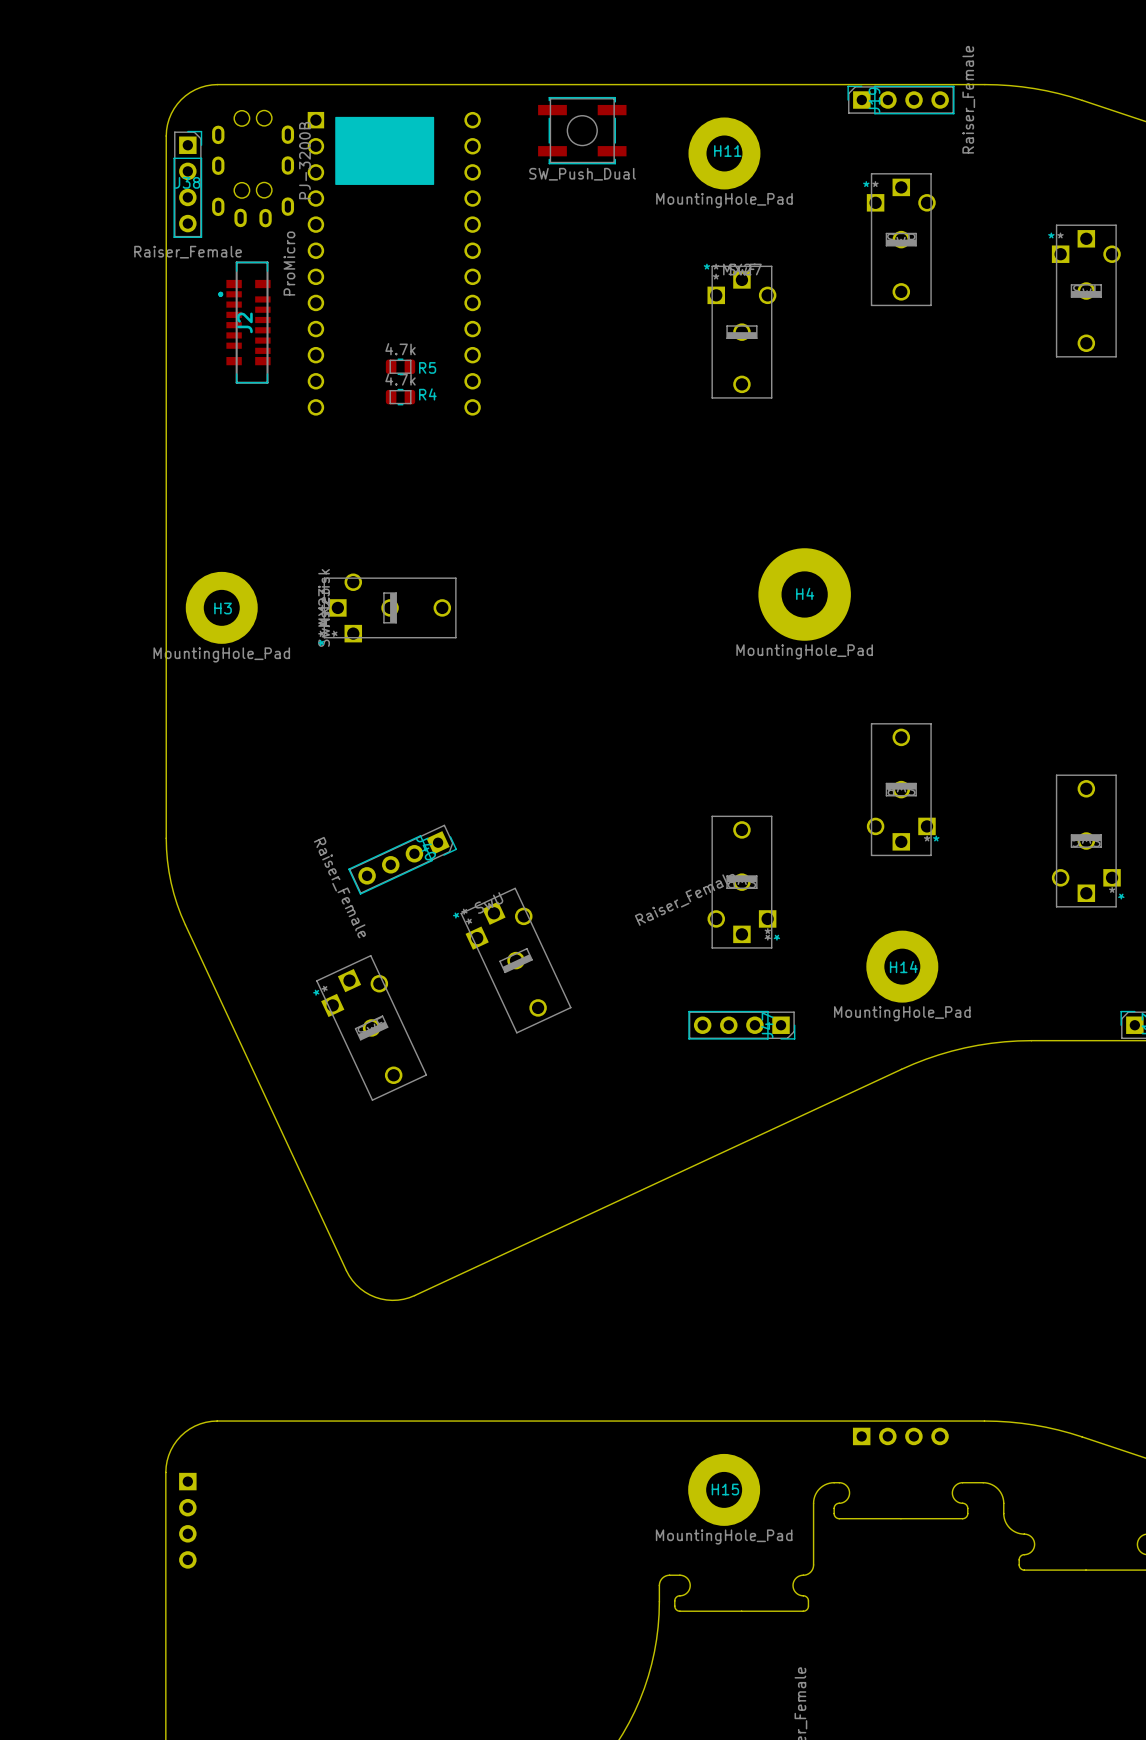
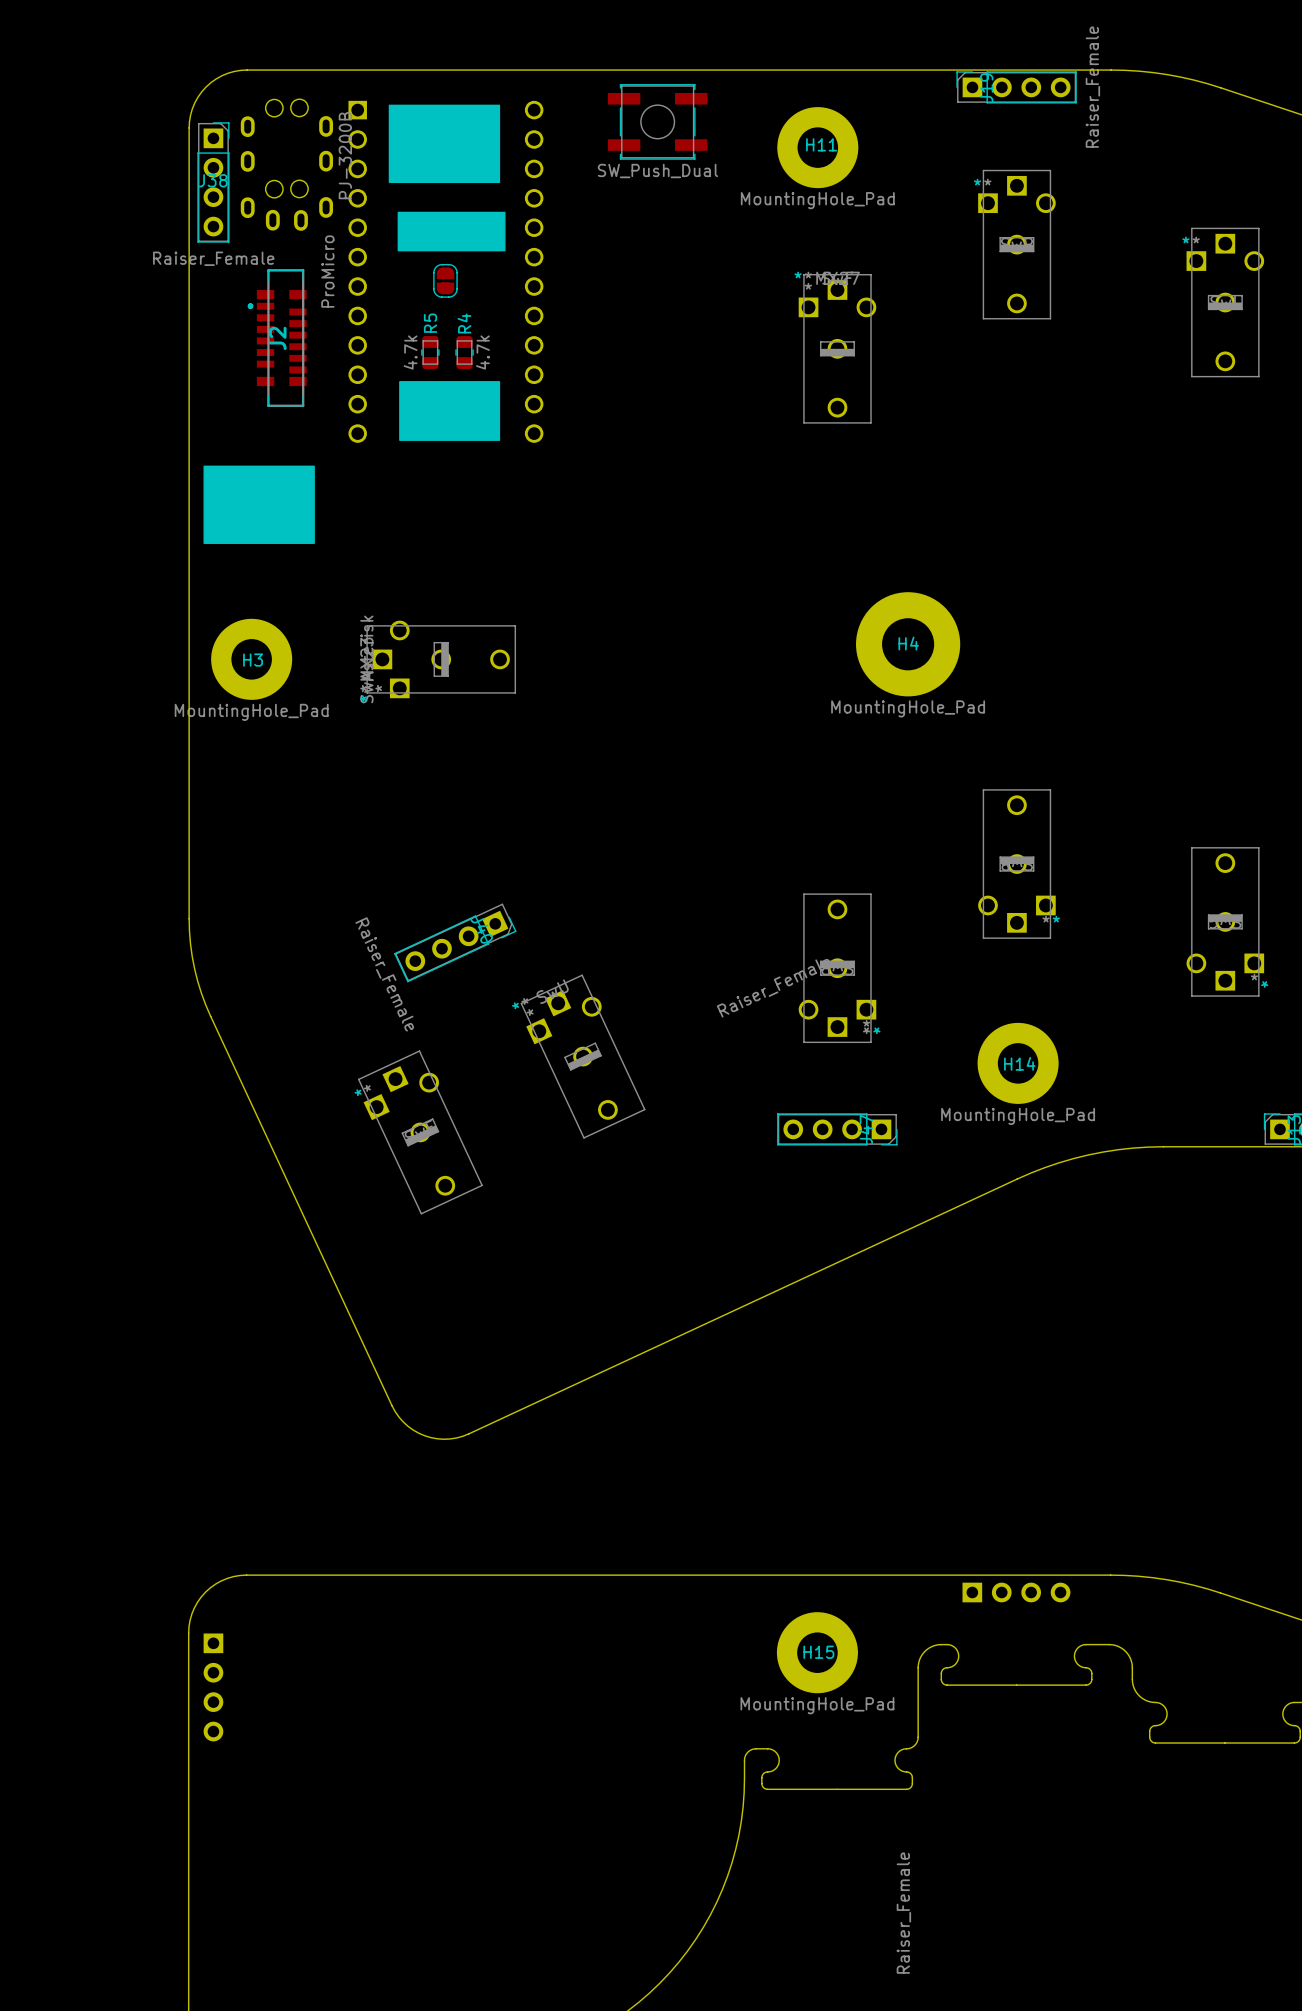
drawing shape: [335, 116, 435, 185] -> [388, 104, 501, 184]
drawing: none -> [397, 211, 506, 252]
part: none -> (445, 280)
R5 value position: 4.7k (400, 349) -> 4.7k (410, 352)
drawing: none -> [399, 381, 501, 441]
R5 rotation: 0° (400, 366) -> 90° clockwise (430, 352)
R5 position: (400, 366) -> (430, 352)
R5 name position: R5 (427, 367) -> R5 (430, 323)
R4 name position: R4 (427, 394) -> R4 (464, 323)
R4 rotation: 0° (400, 397) -> 90° clockwise (464, 352)
R4 position: (400, 397) -> (464, 352)
drawing: none -> [203, 465, 315, 544]

